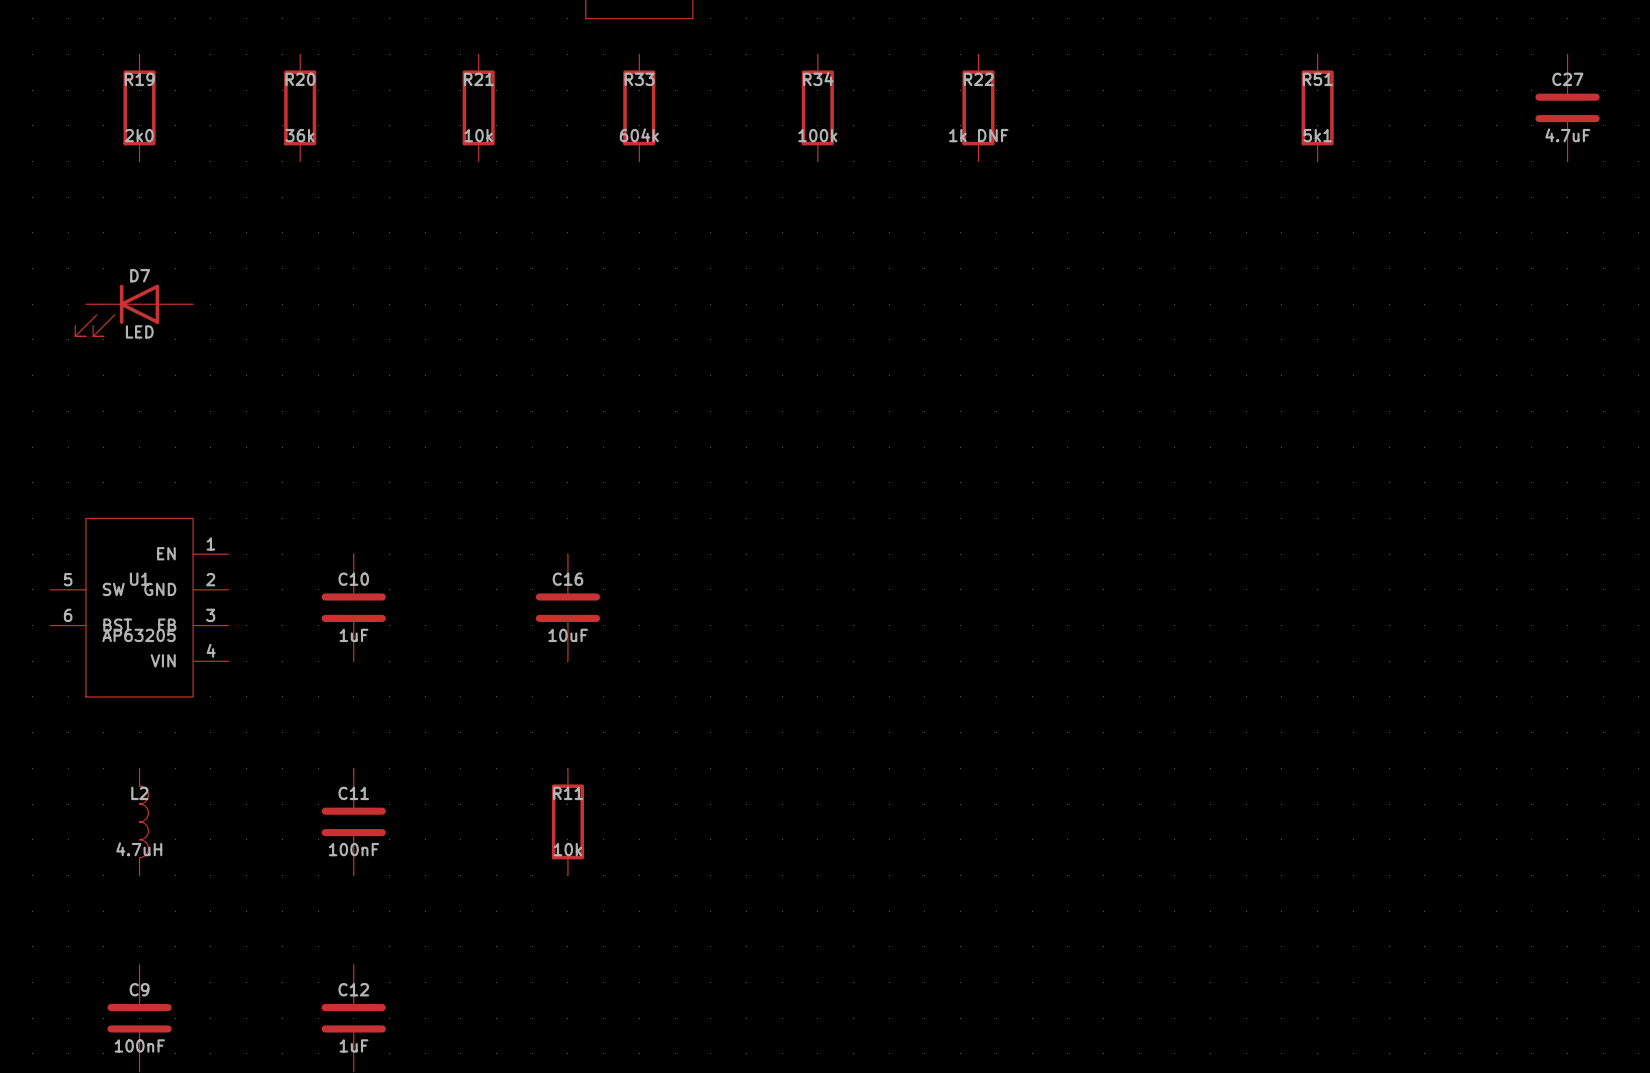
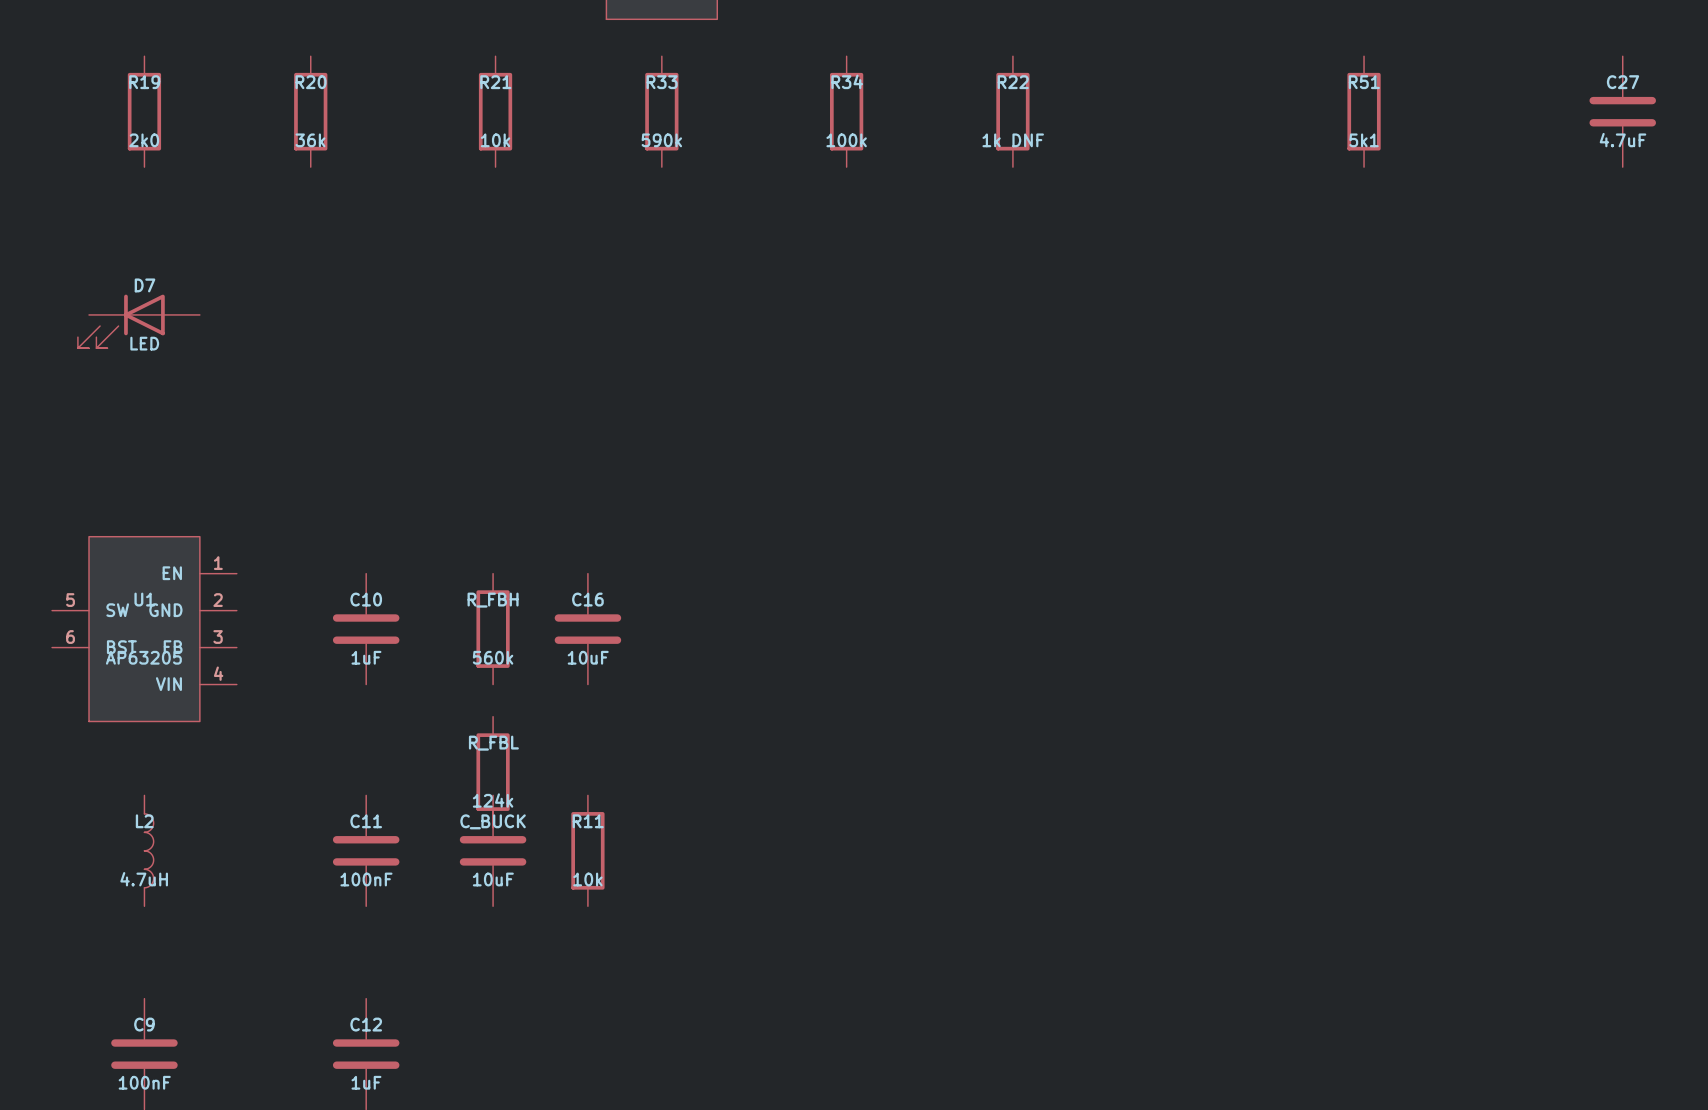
R33 value: 604k (639, 135) -> 590k (661, 140)
R_FBH: none -> 560k (493, 629)
R_FBL: none -> 124k (493, 772)
C_BUCK: none -> 10uF (493, 850)

